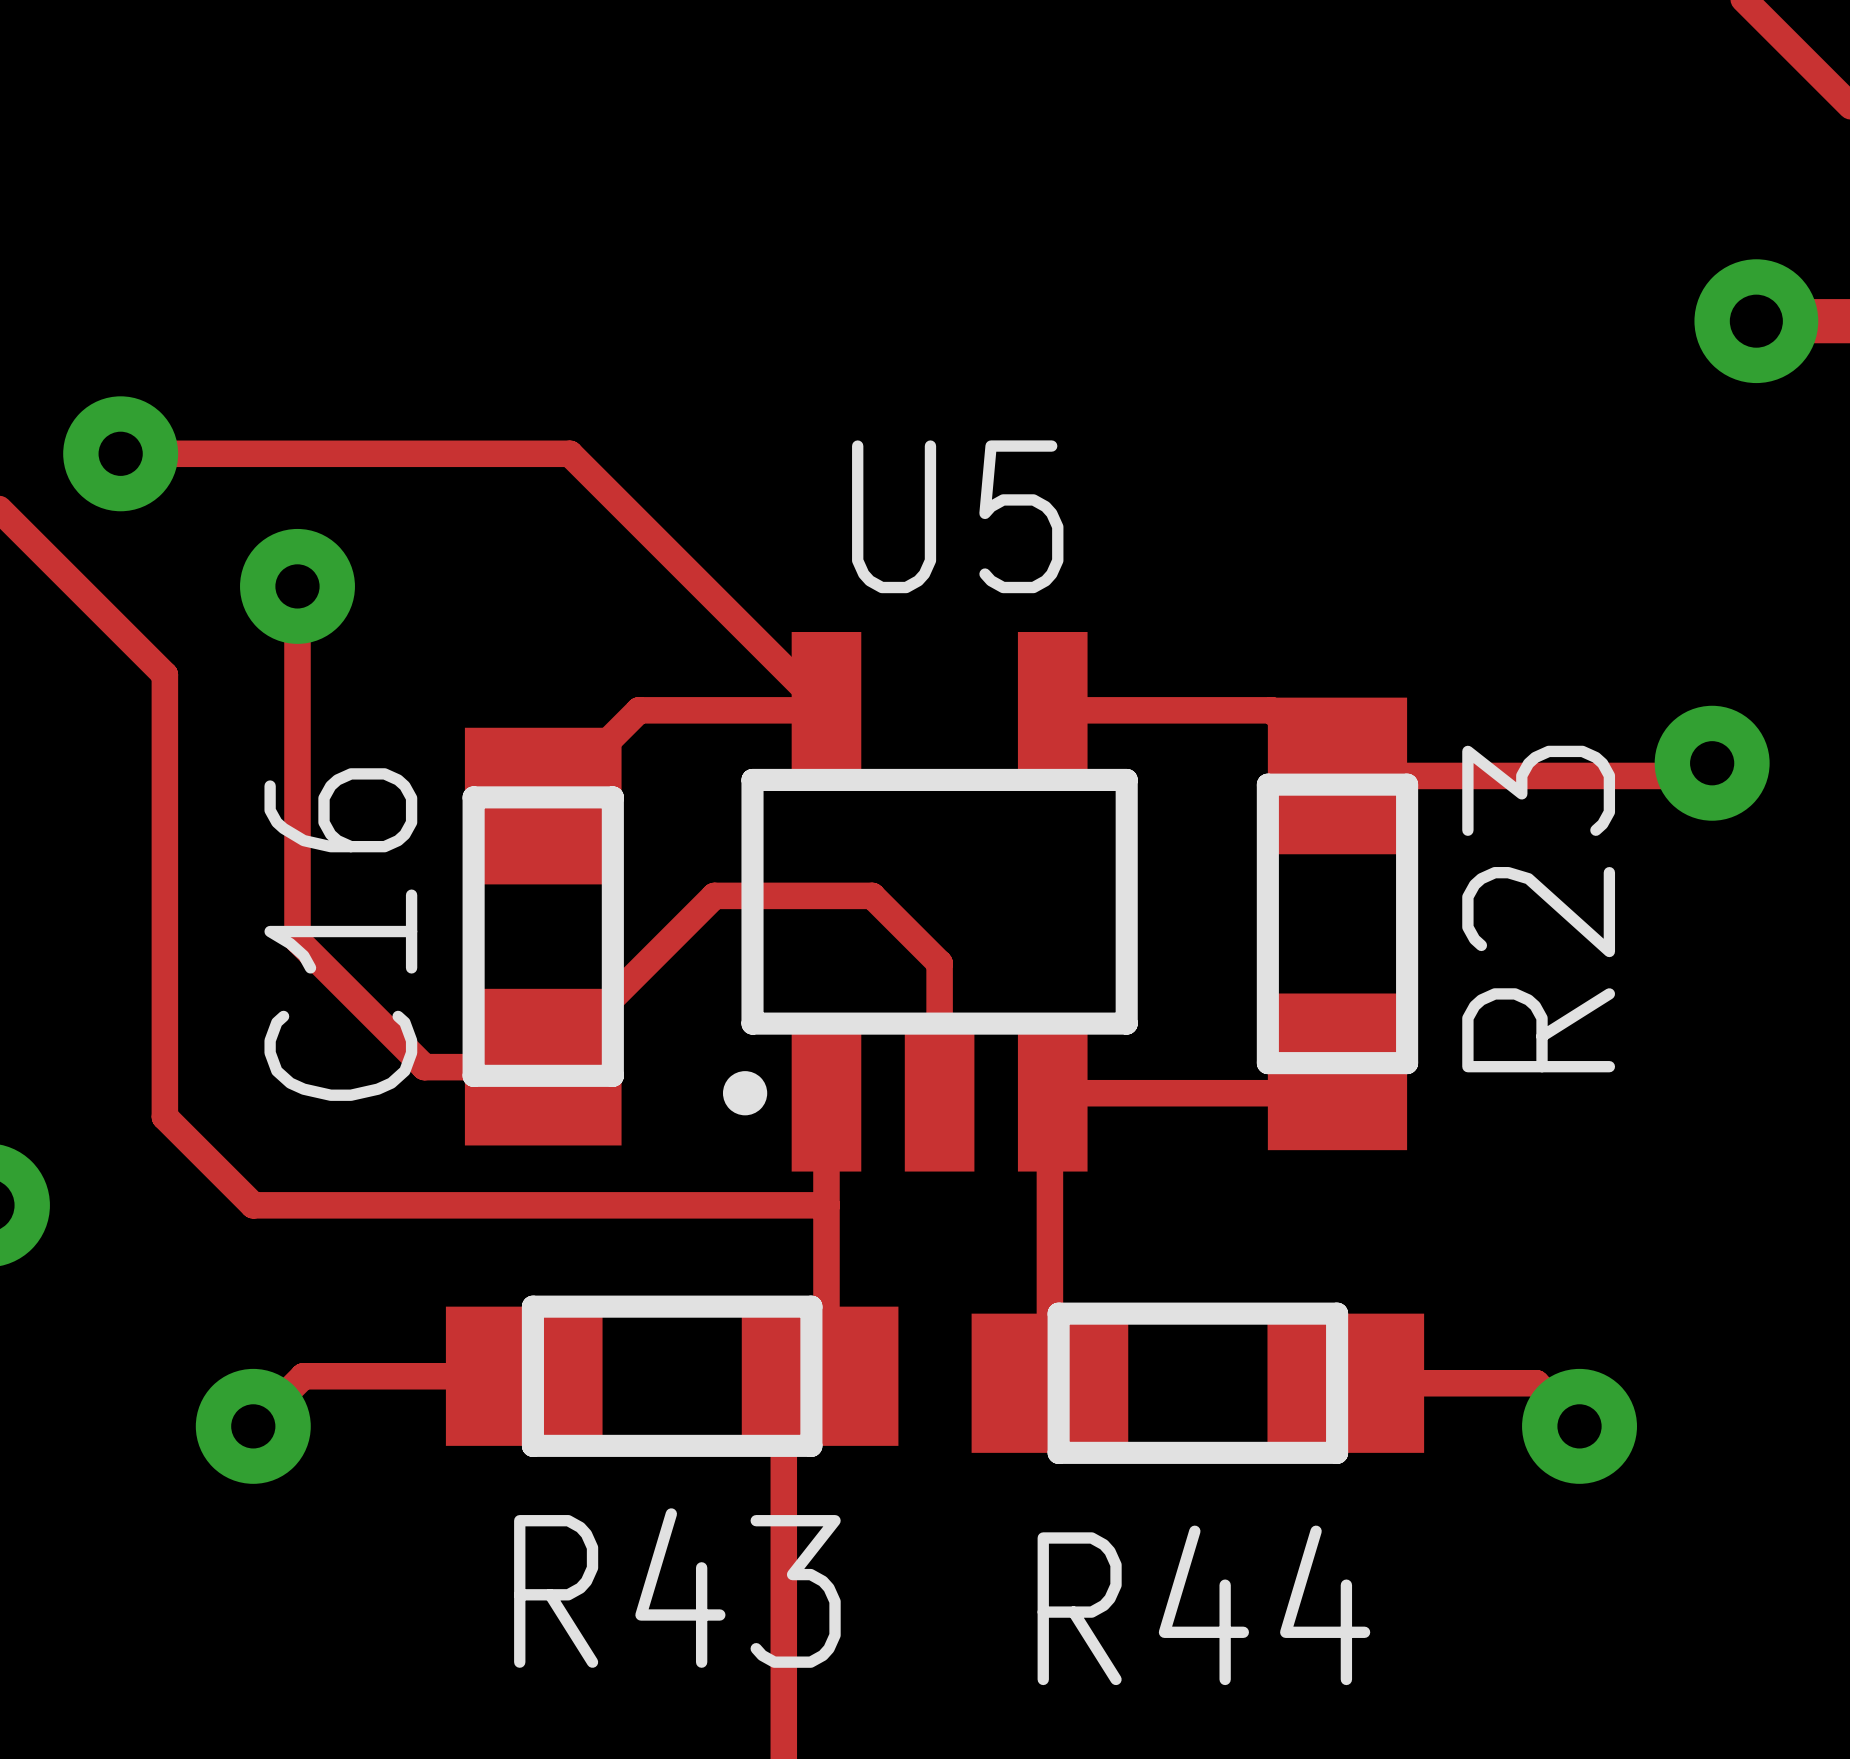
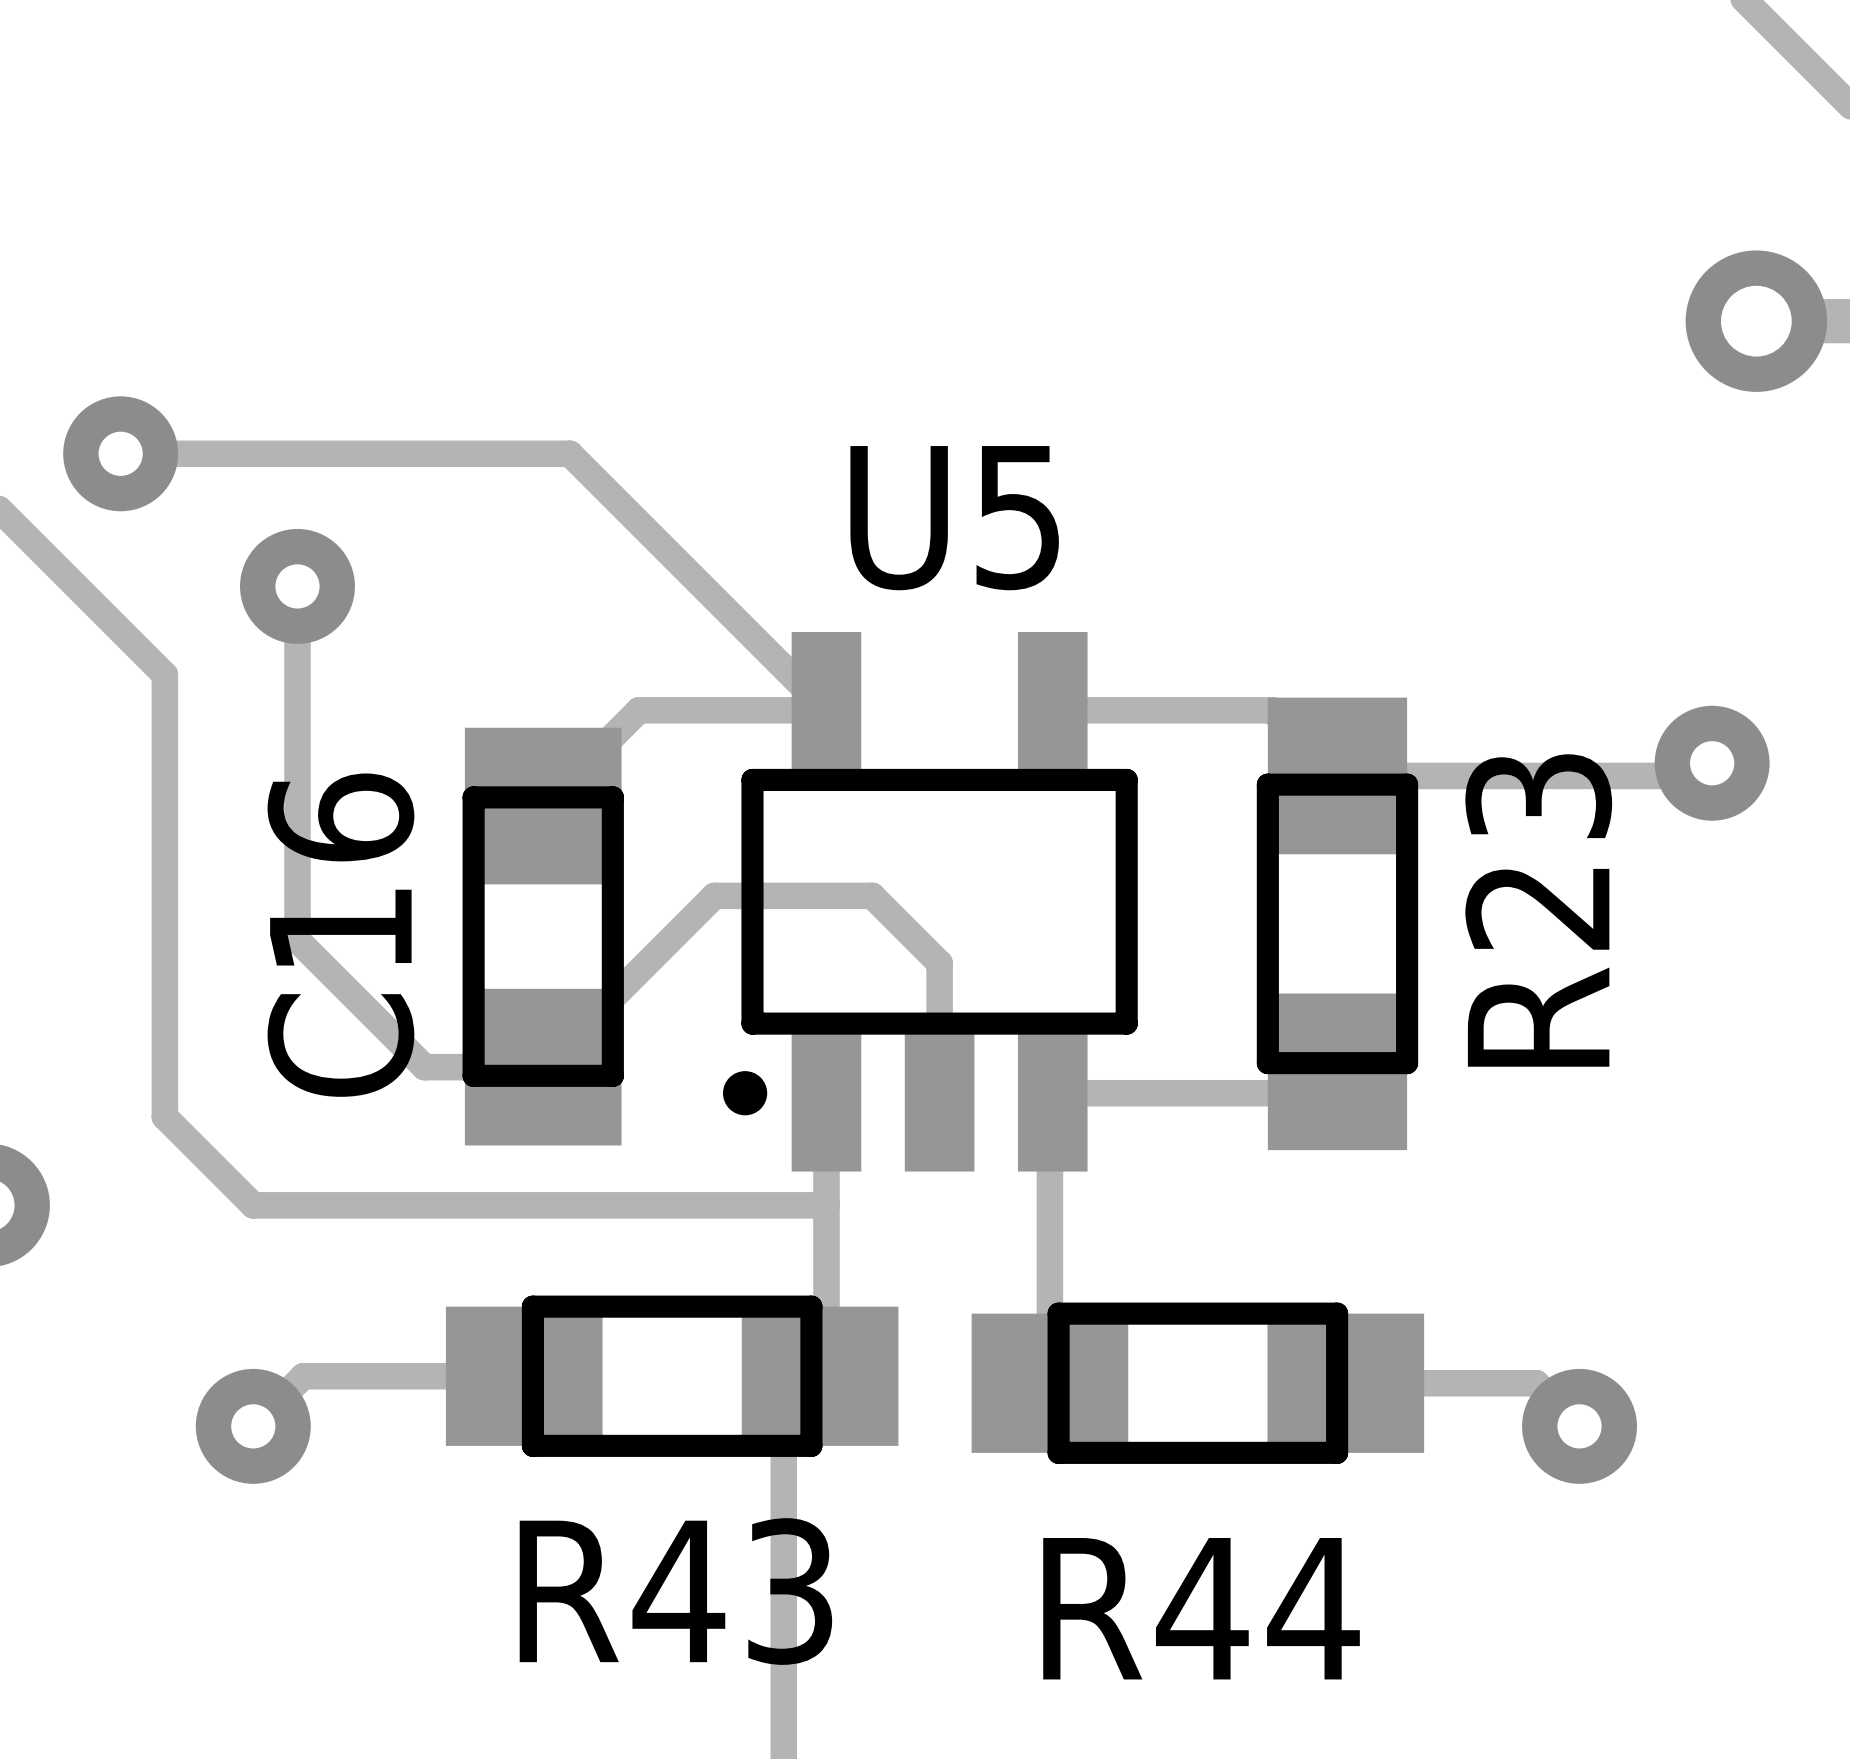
via size: [1694, 259, 1819, 384] -> [1685, 250, 1828, 392]

